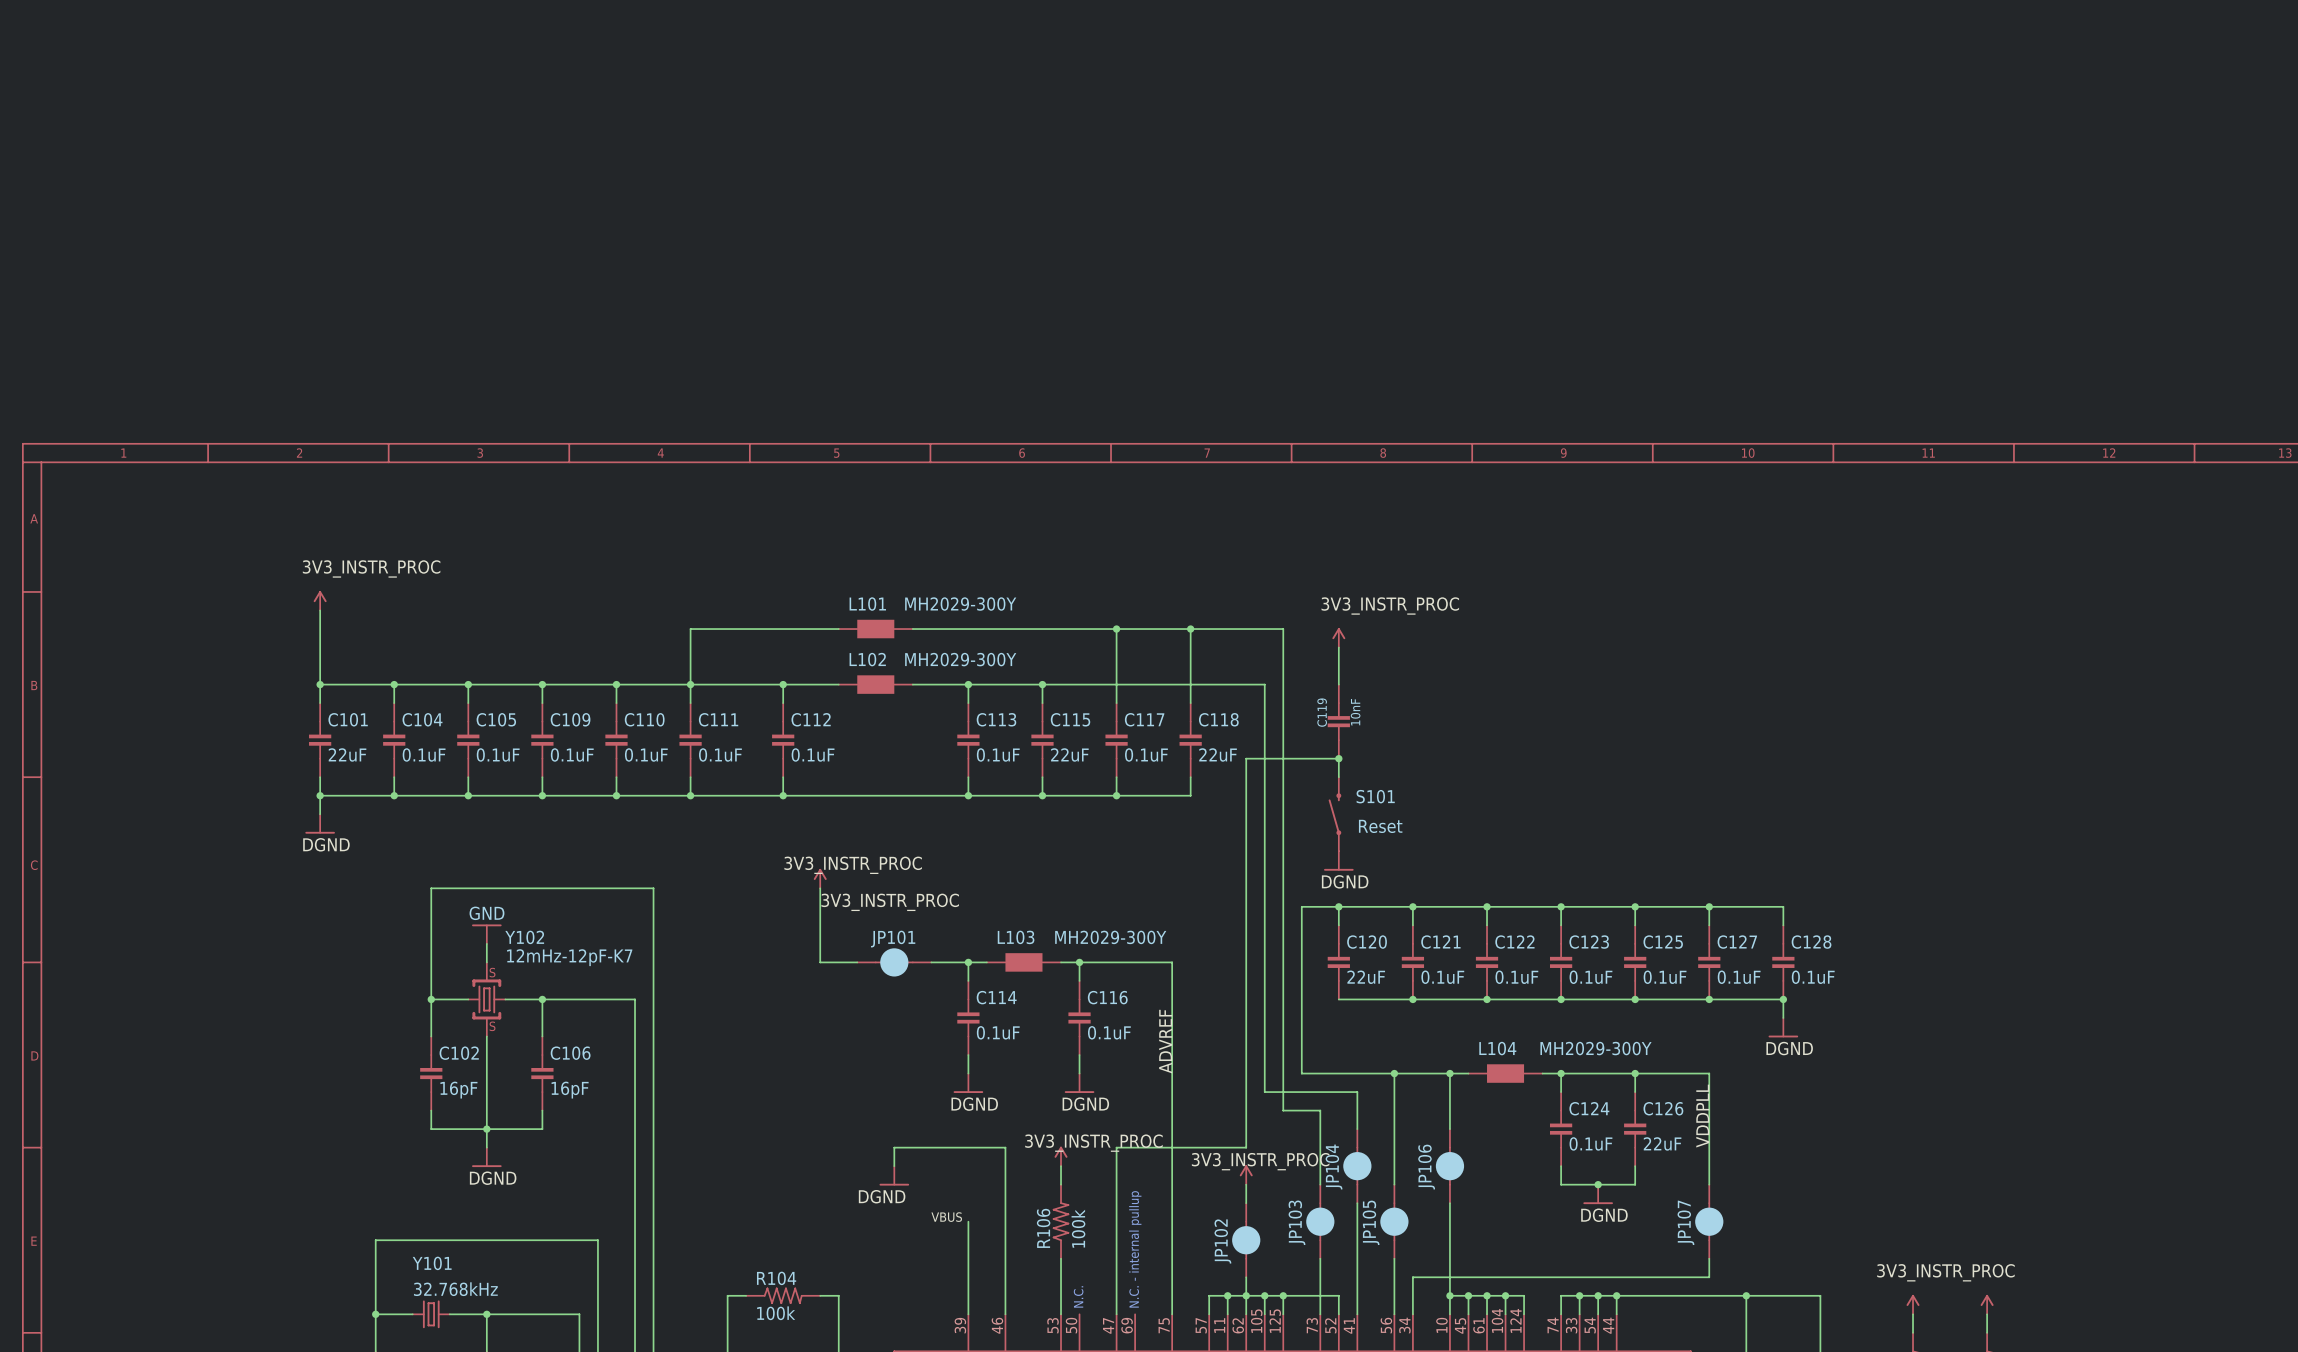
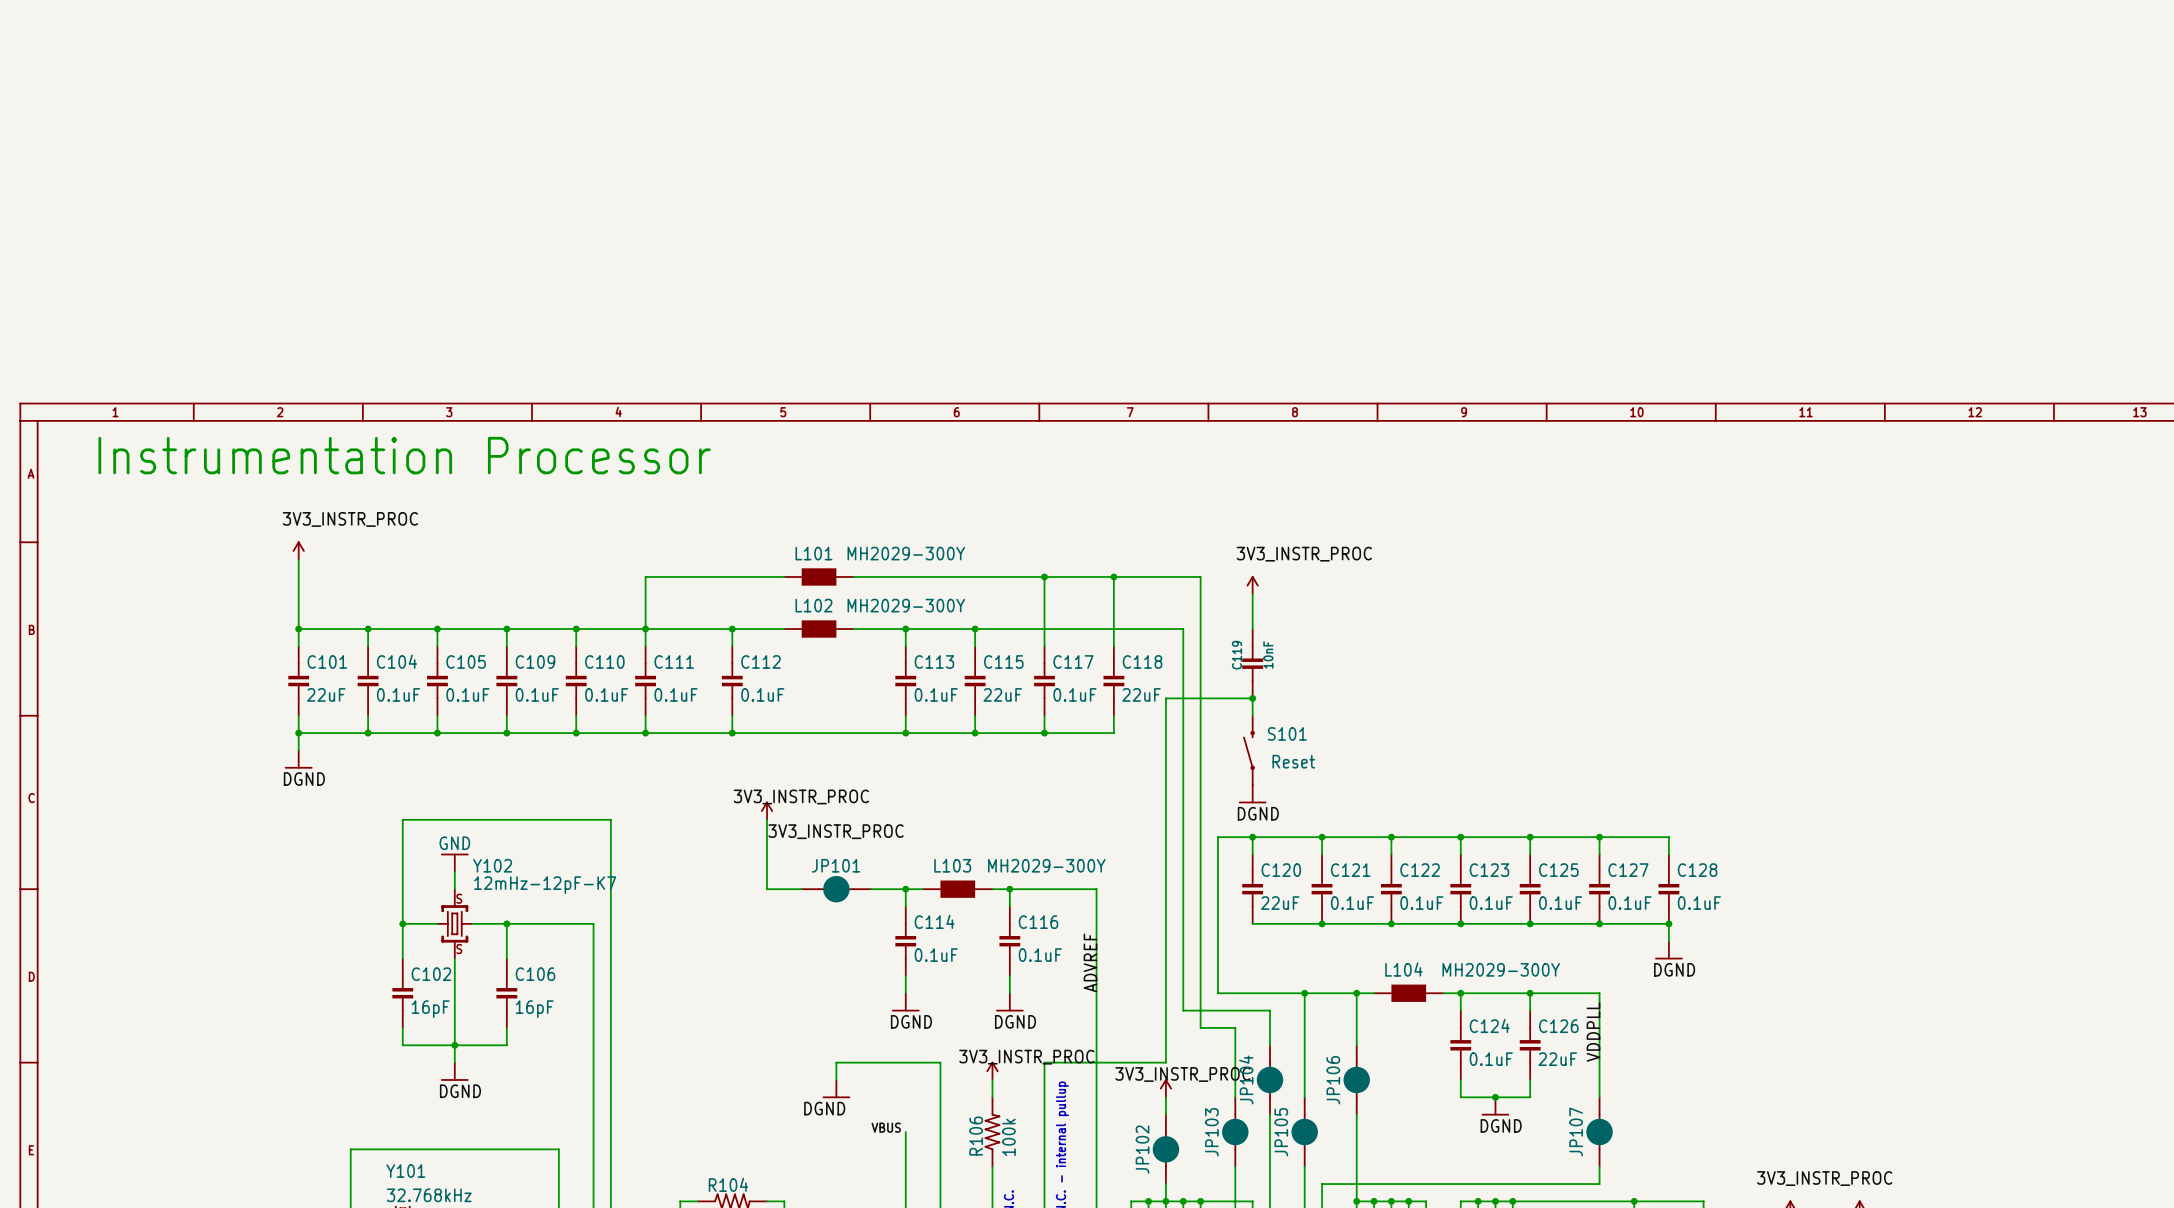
text: none -> Instrumentation Processor (404, 455)

